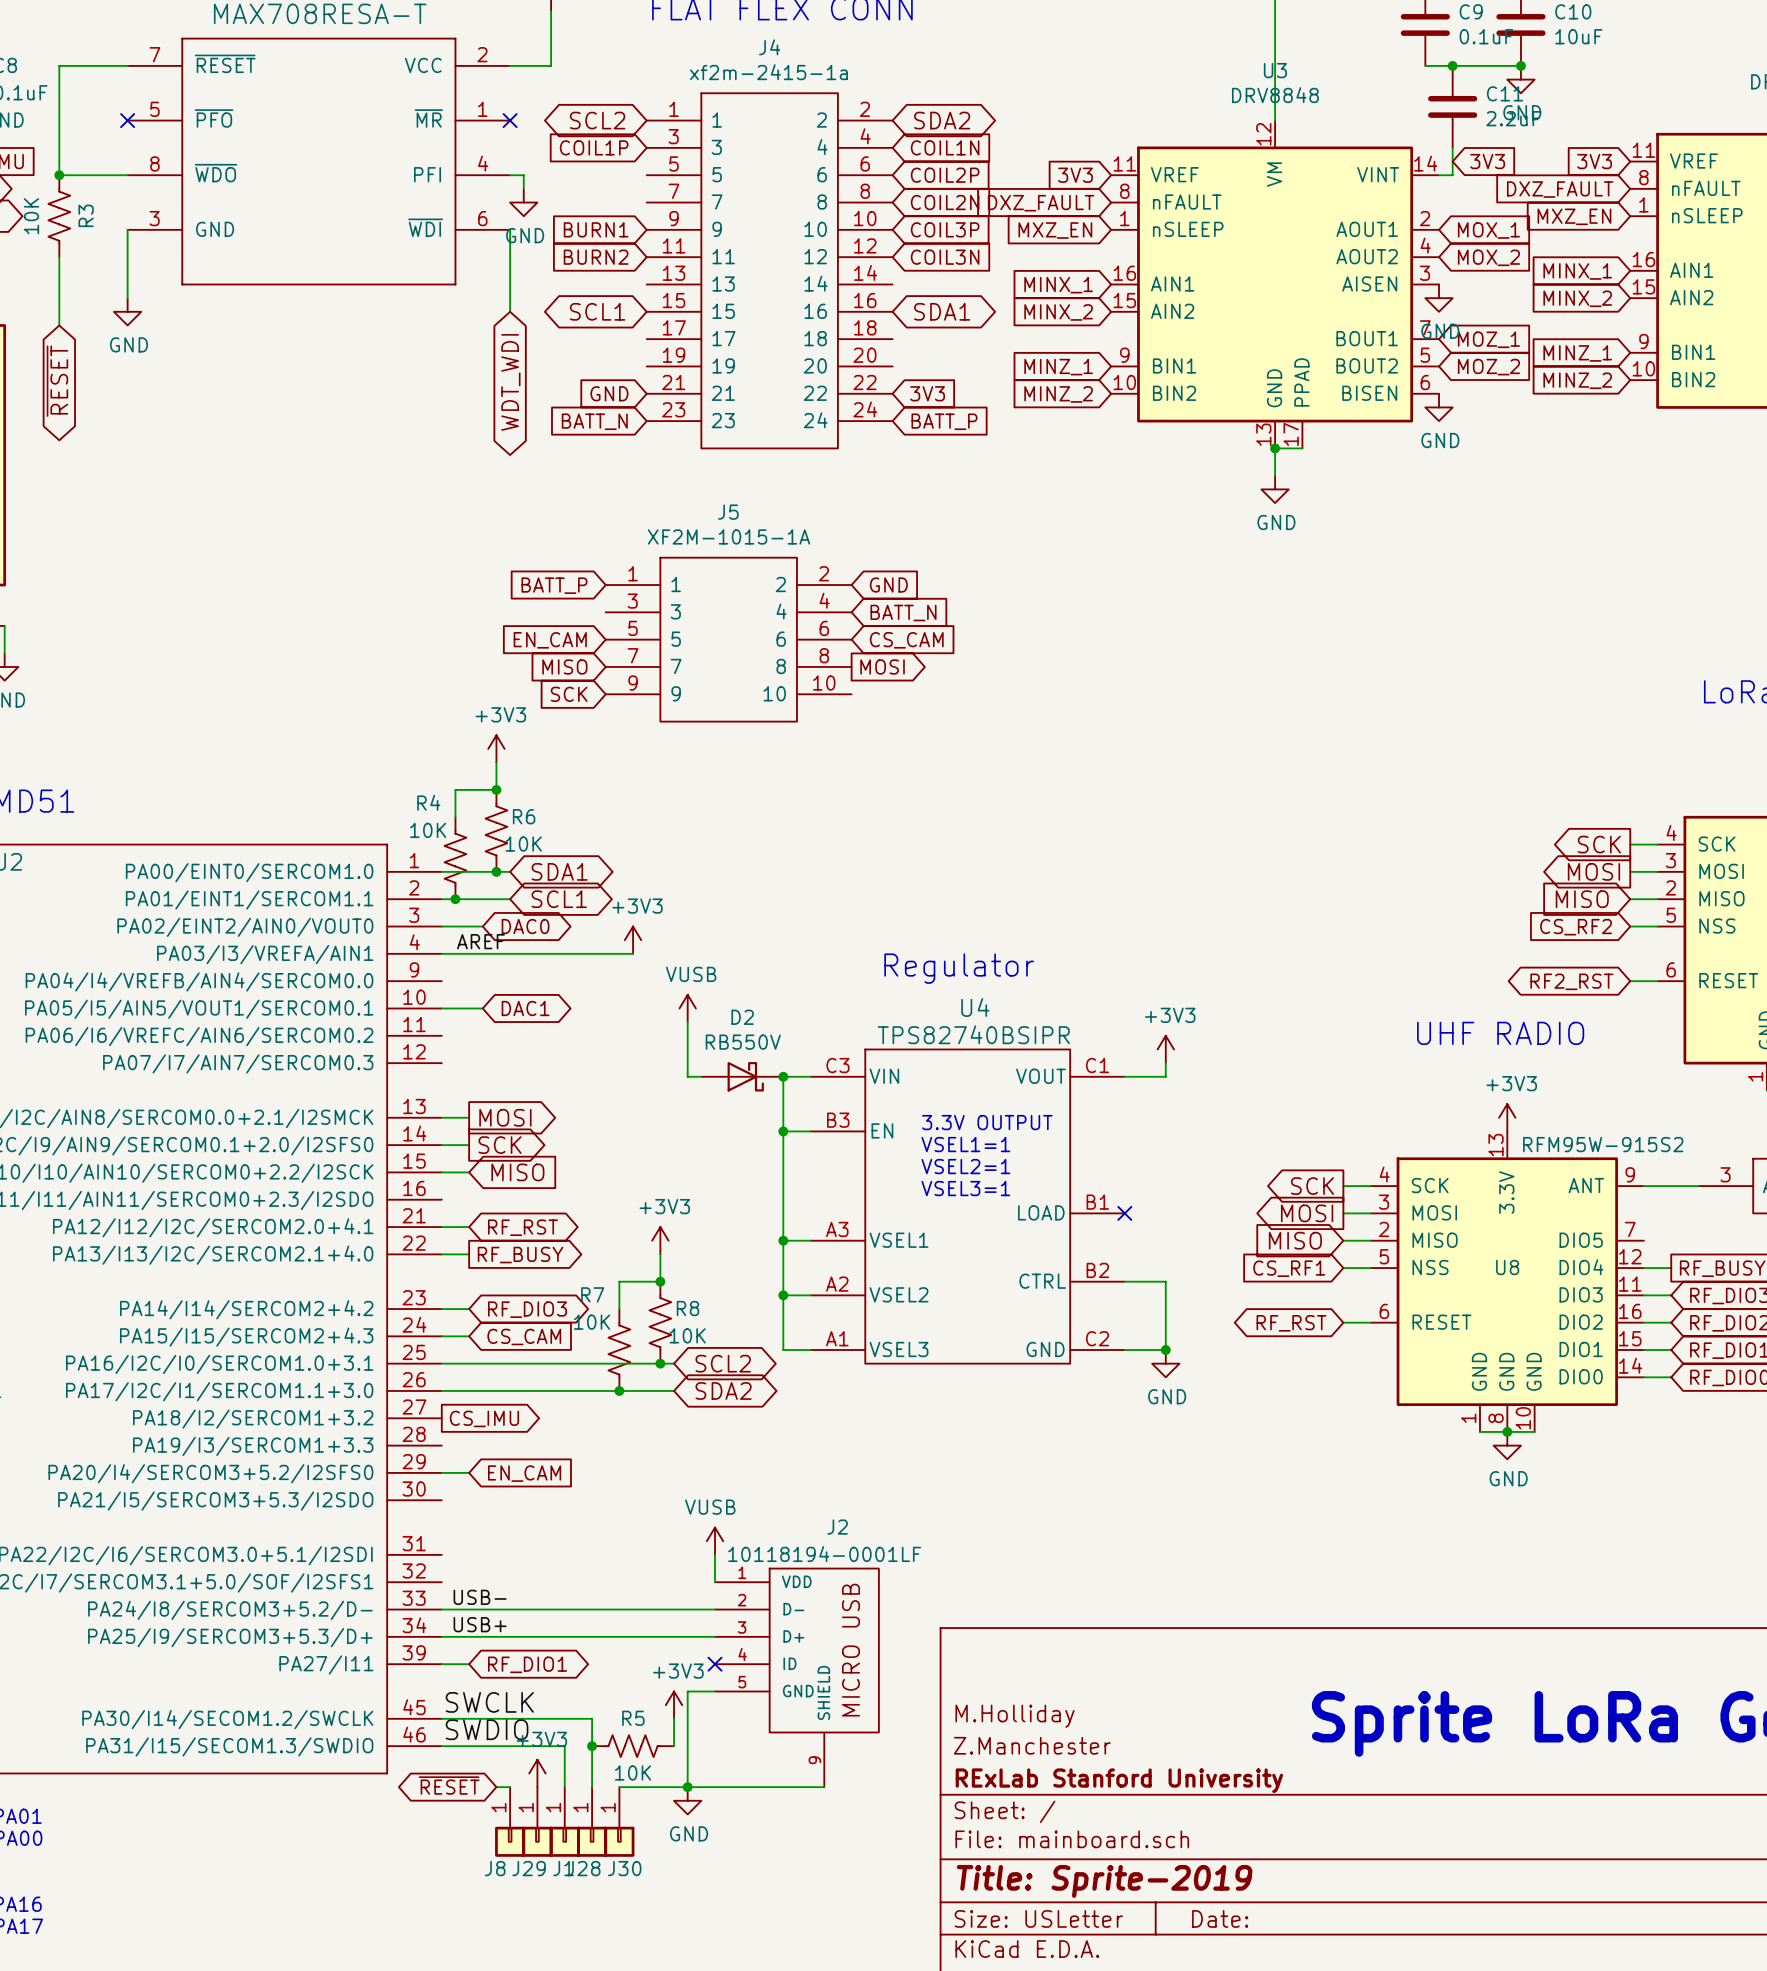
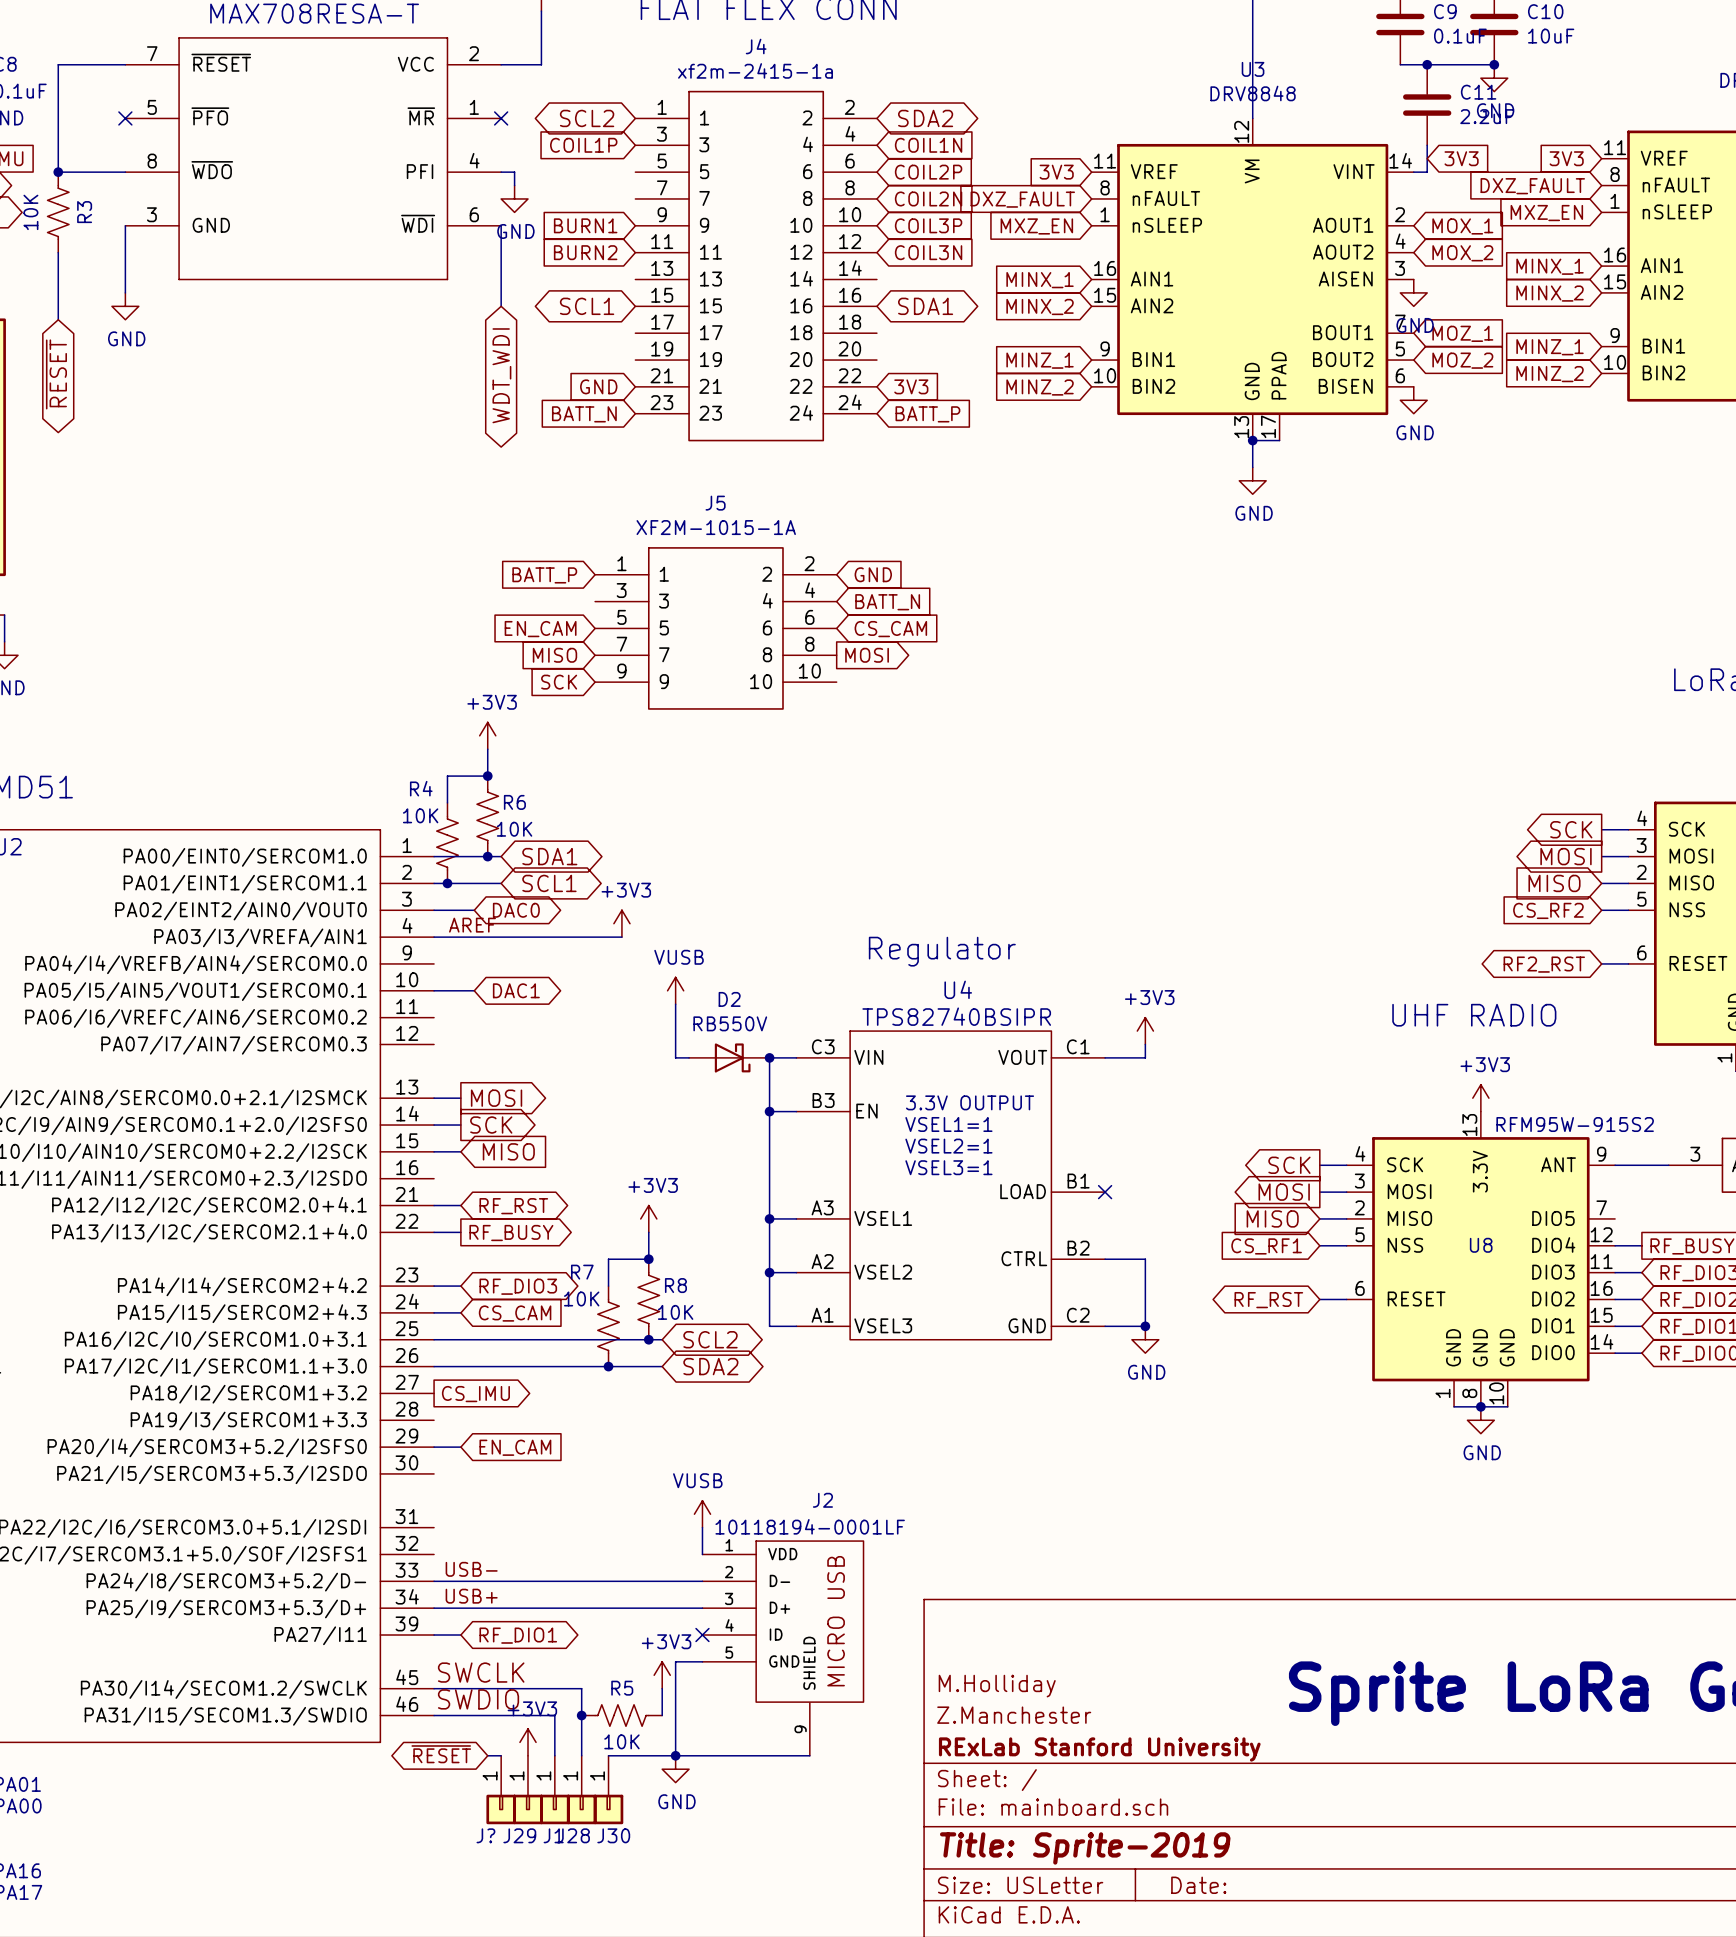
J8 name: J8 (495, 1868) -> J? (485, 1835)

